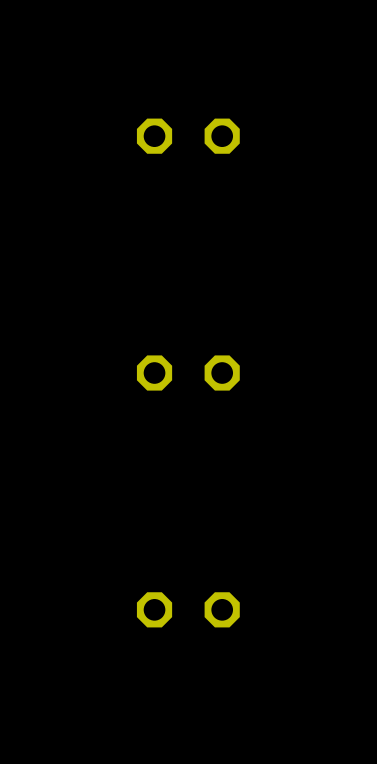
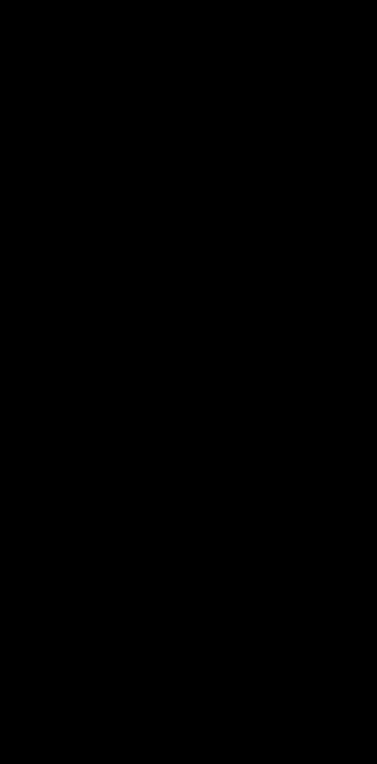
part: (188, 136) -> none
part: (188, 373) -> none
part: (188, 609) -> none

